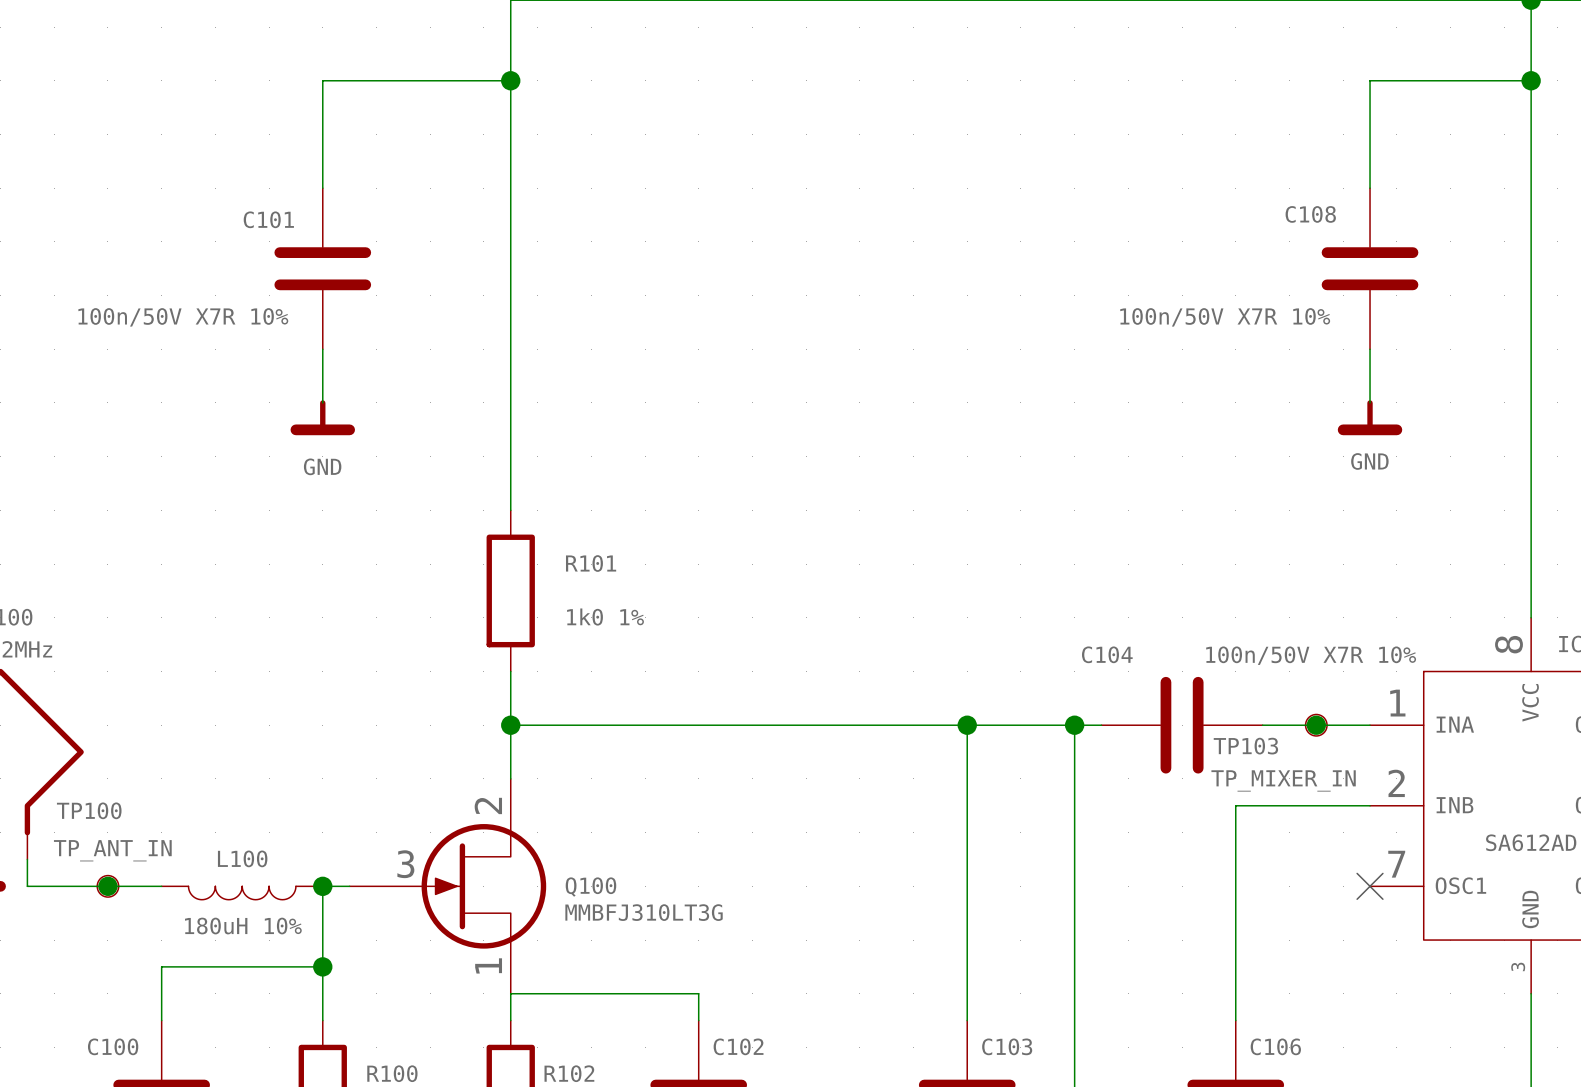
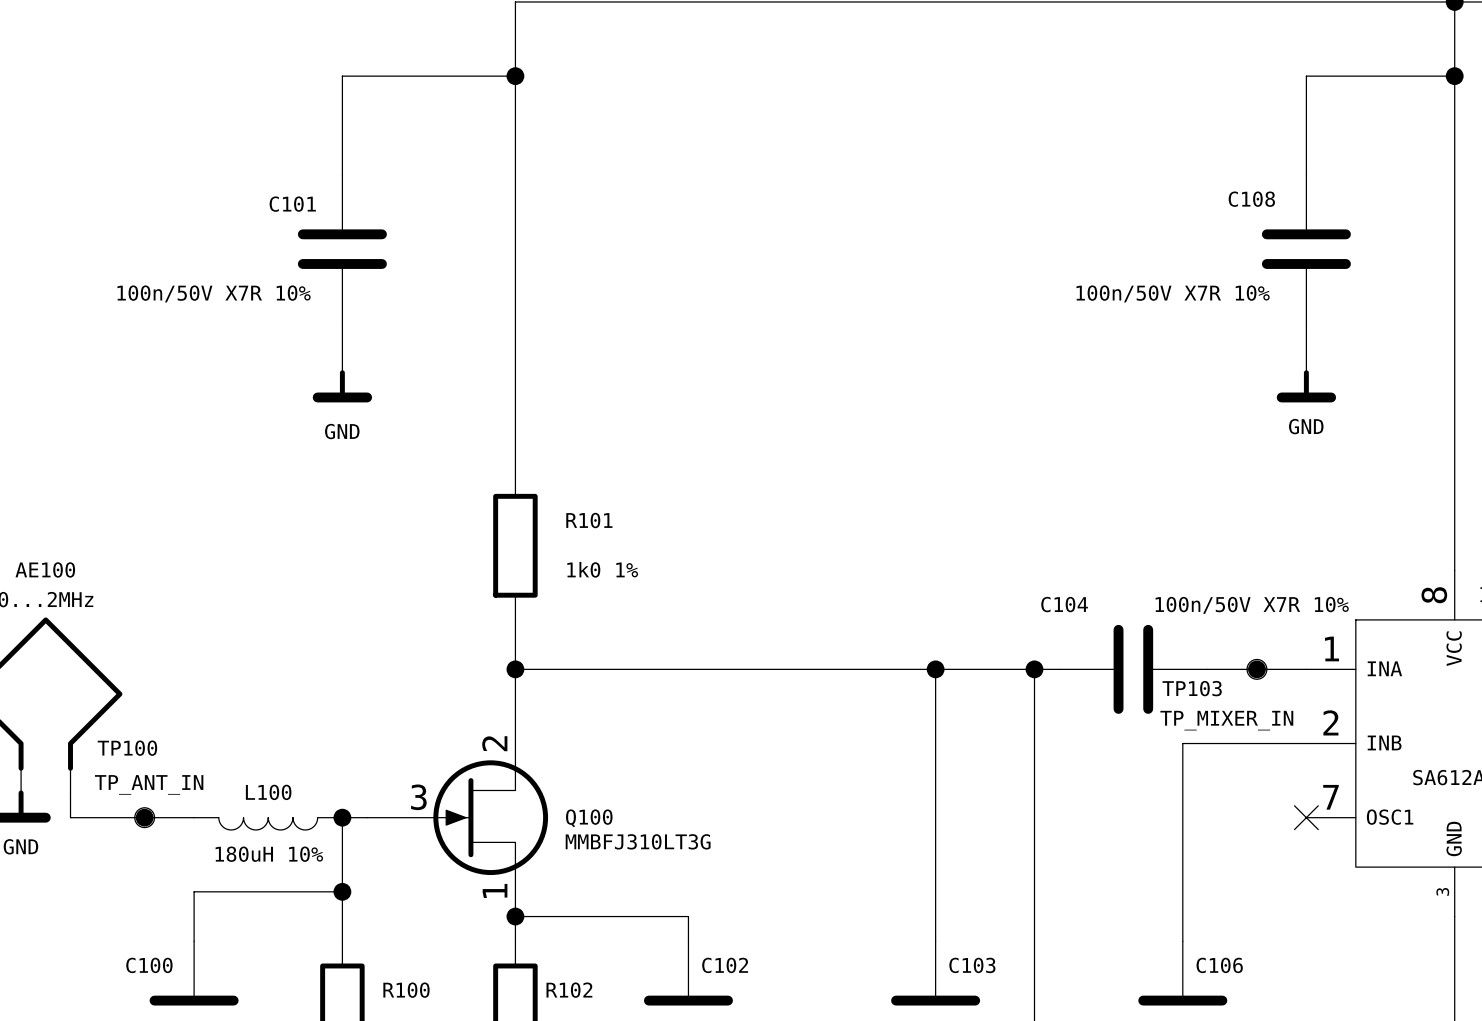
junction: none -> (515, 916)

